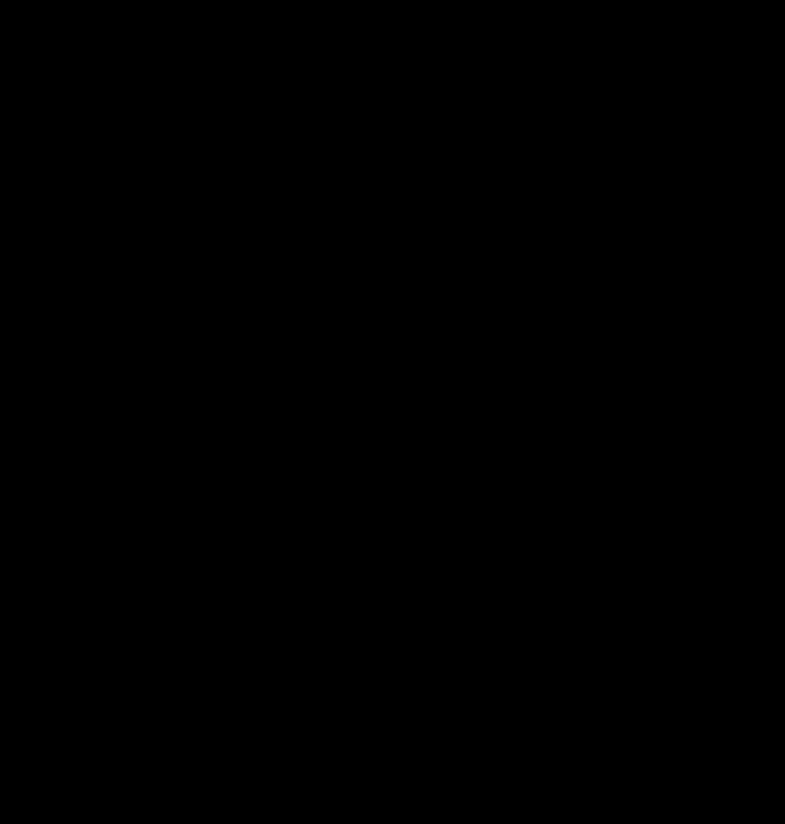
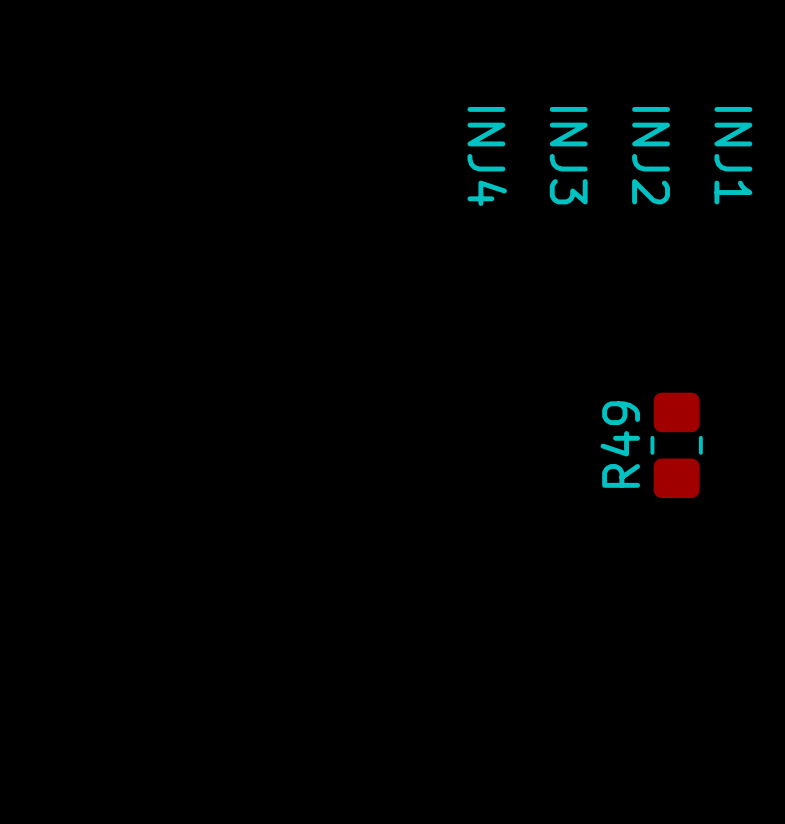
text: none -> INJ3 (568, 155)
text: none -> INJ2 (651, 155)
text: none -> INJ1 (733, 155)
text: none -> INJ4 (487, 156)
R49: none -> (676, 445)

